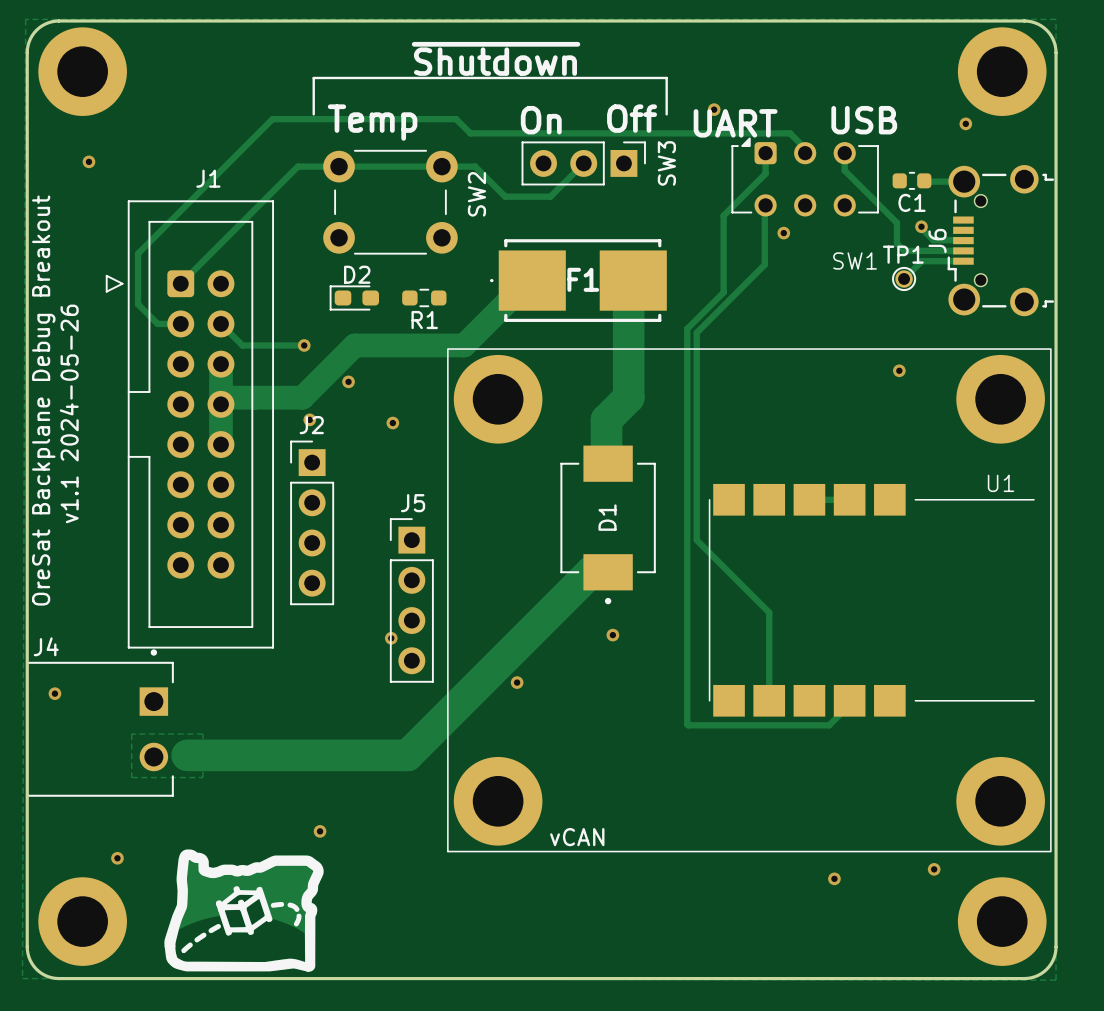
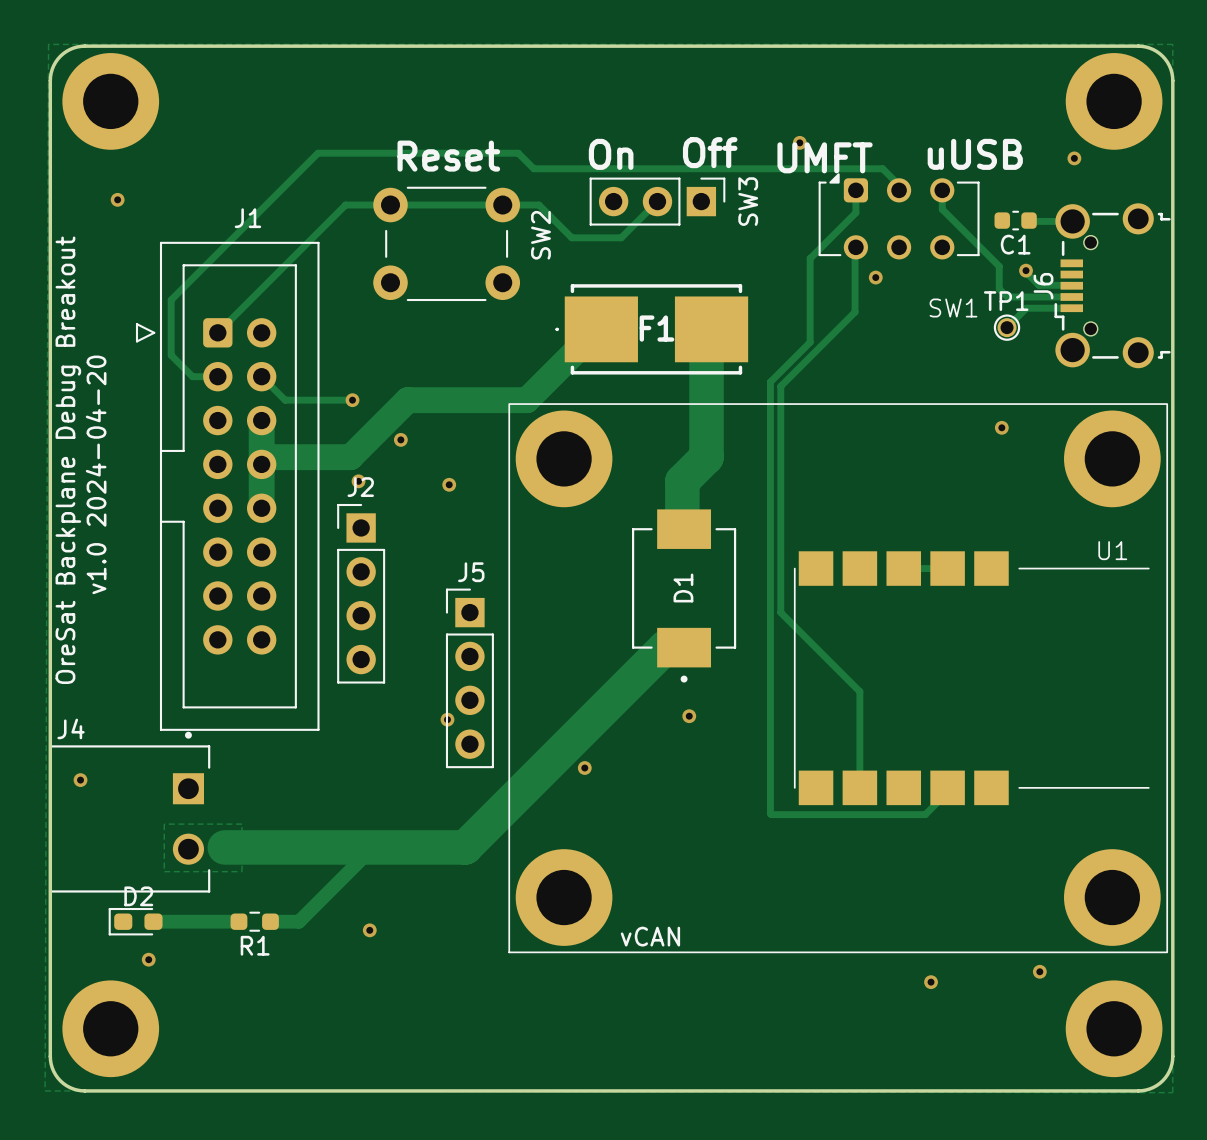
text: ~{Shutdown} (496, 58) -> none
line: (313, 114) (313, 77) (666, 77) (666, 114) -> none
text: USB (864, 120) -> uUSB (975, 154)
text: Temp (372, 122) -> Reset (448, 156)
text: UART (735, 123) -> UMFT (825, 157)
D2 position: (354, 297) -> (135, 921)
R1 position: (424, 297) -> (254, 921)
text: v1.1 2024-05-26 (69, 413) -> v1.0 2024-04-20 (96, 474)
track: none -> (373, 847) (298, 921) (270, 921)
track: none -> (153, 921) (238, 921)
drawing: [164, 849, 324, 972] -> none

